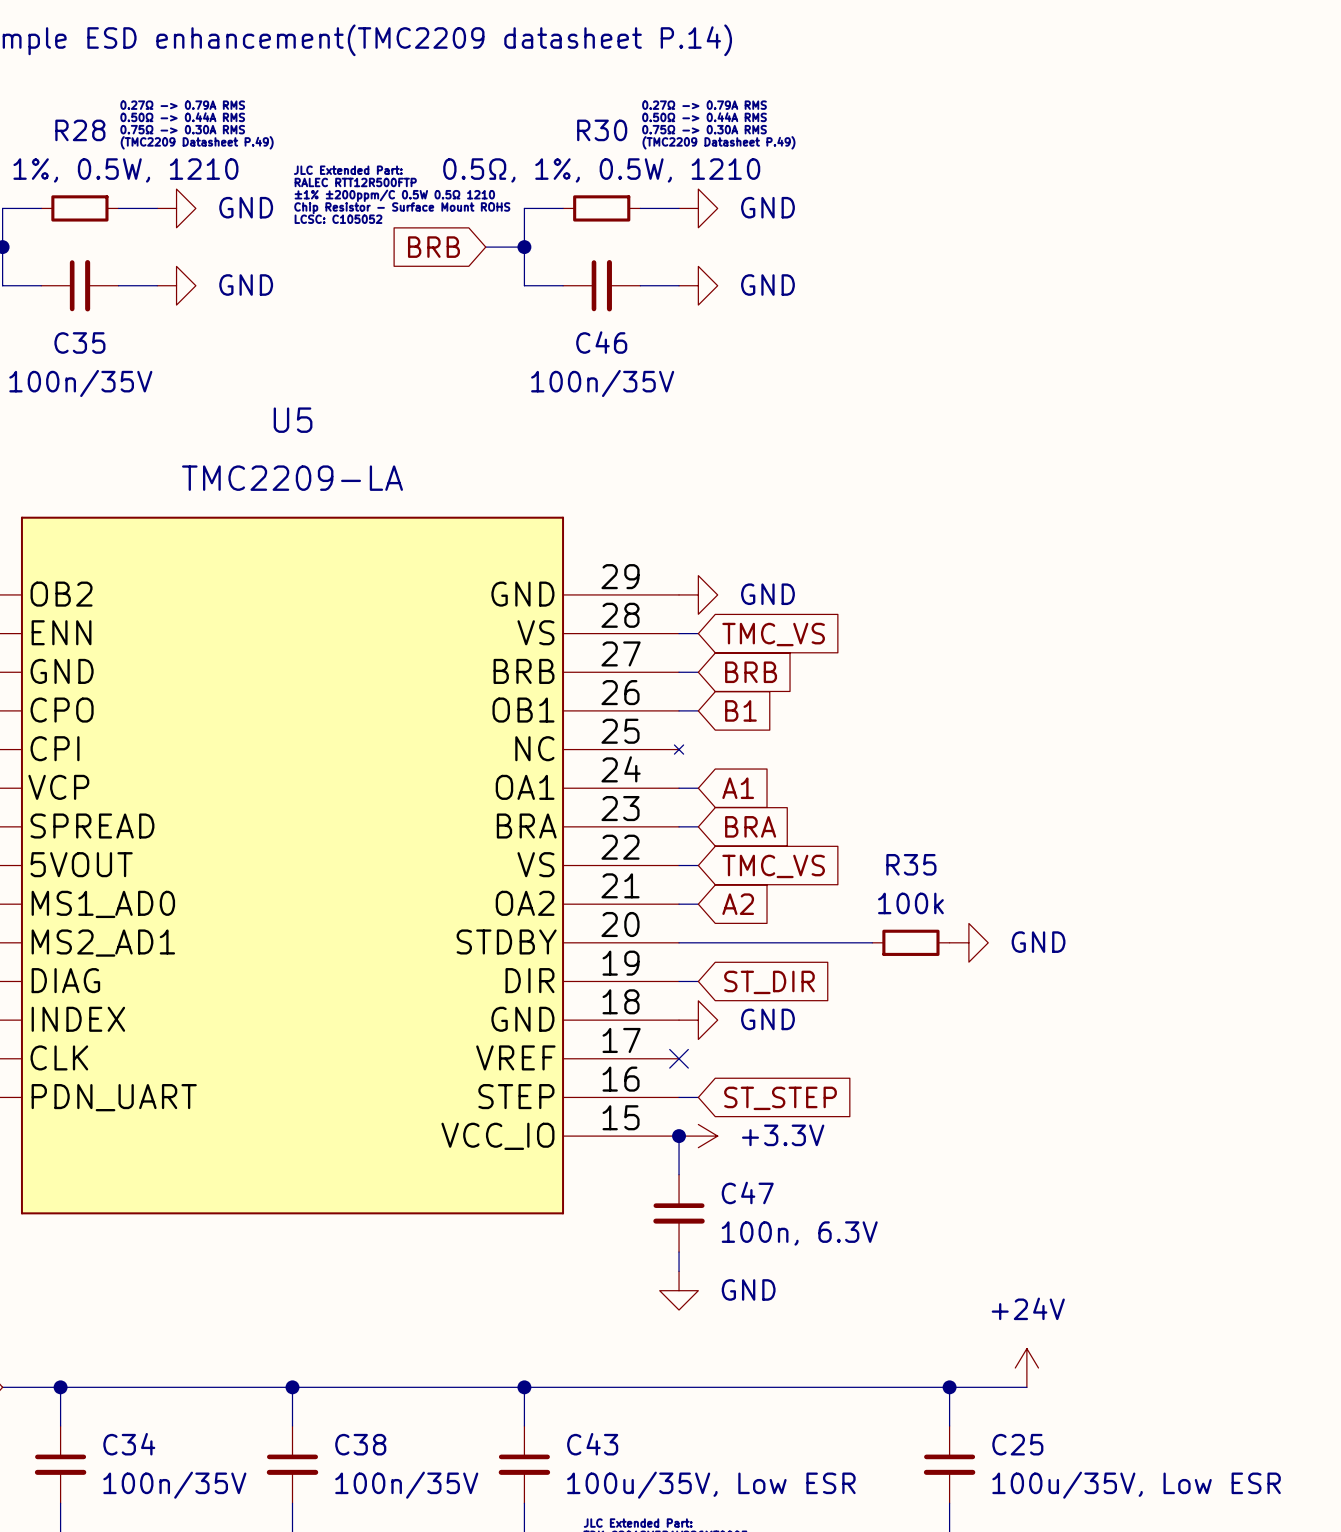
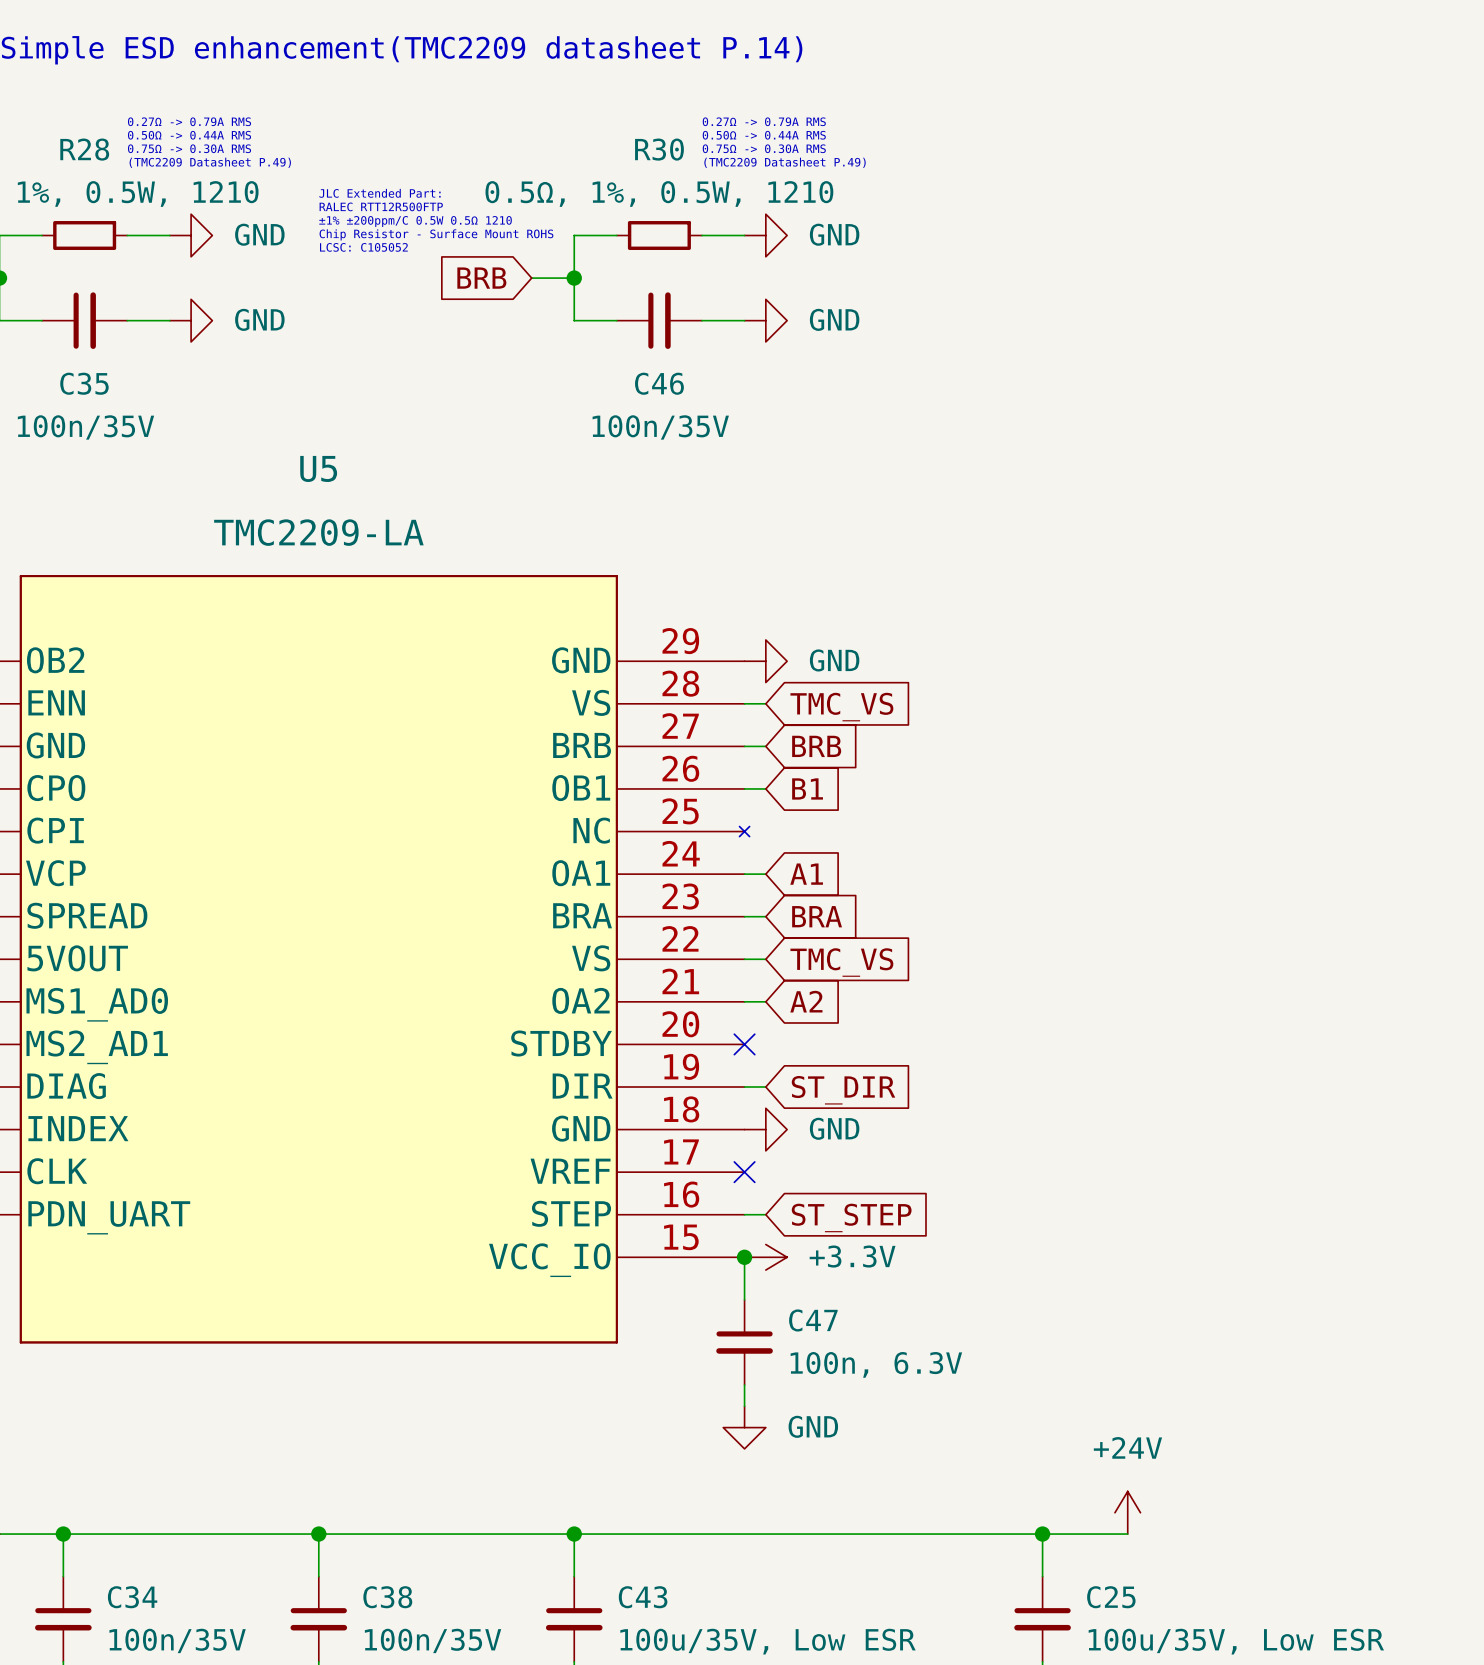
wire: (679, 942) (872, 942) -> none
no-connect mark: none -> (744, 1044)
R35: 100k (910, 942) -> none
power symbol: GND (968, 942) -> none

